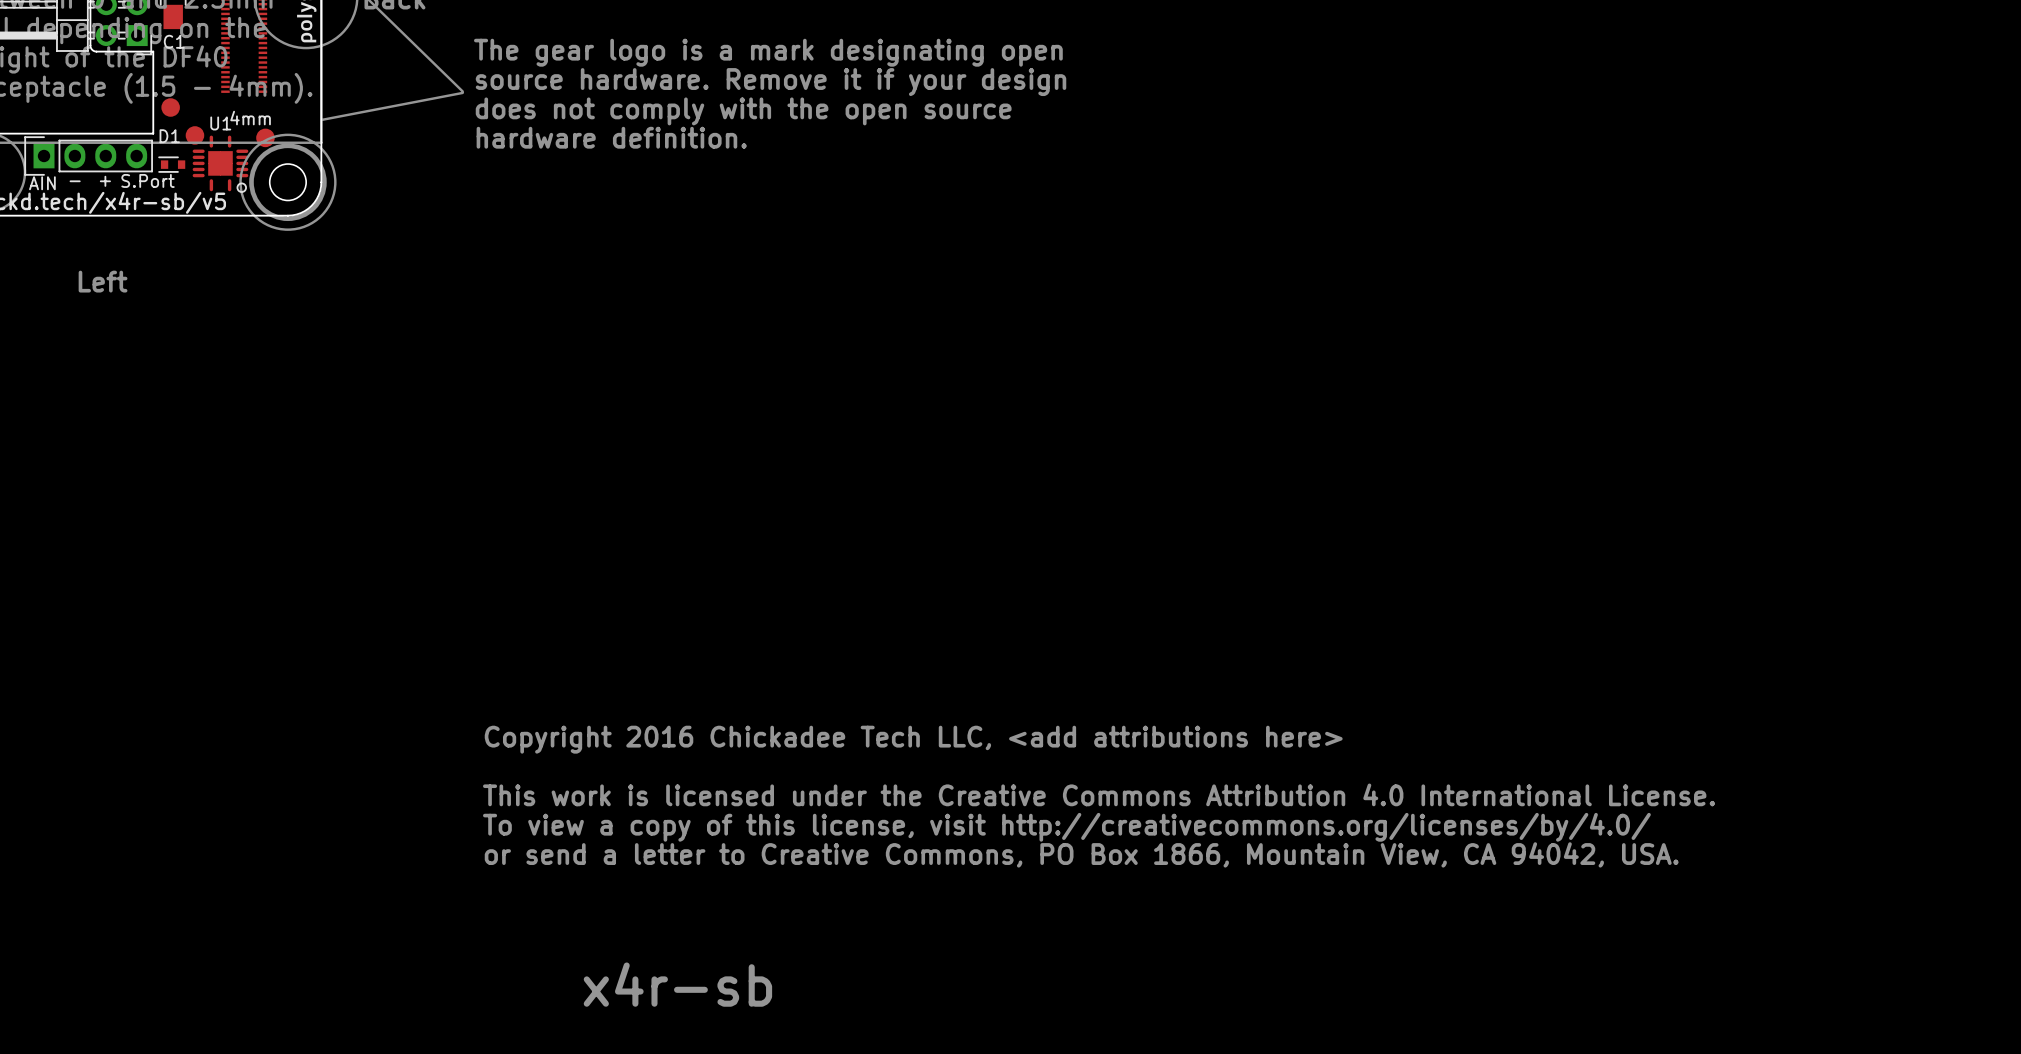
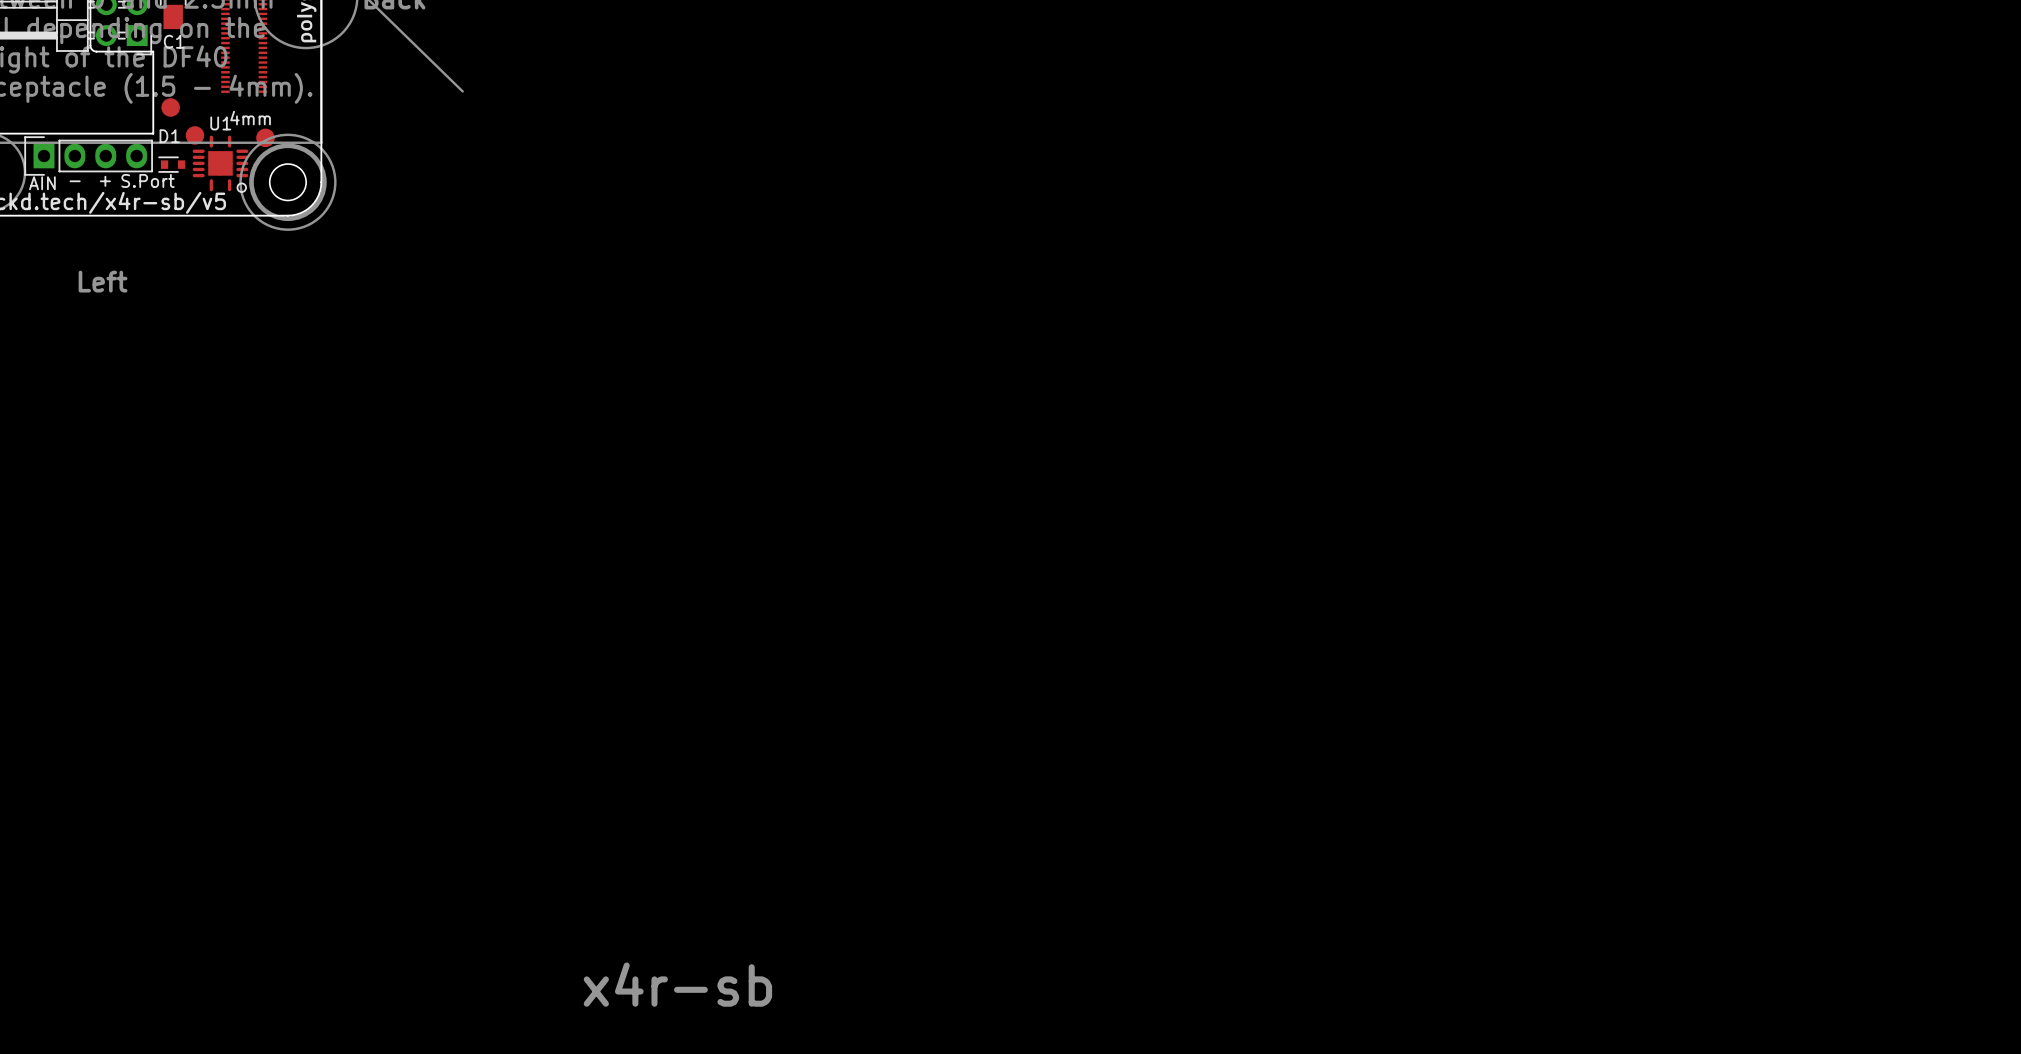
text: The gear logo is a mark designating open (768, 52) -> none
text: source hardware. Remove it if your design (771, 82) -> none
line: (462, 92) (323, 119) -> none
text: does not comply with the open source (743, 111) -> none
text: hardware definition. (611, 137) -> none
text: Copyright 2016 Chickadee Tech LLC, <add attributions here> (913, 739) -> none
text: This work is licensed under the Creative Commons Attribution 4.0 International License. (1099, 794) -> none
text: To view a copy of this license, visit http://creativecommons.org/licenses/by/4.0/ (1066, 827) -> none
text: or send a letter to Creative Commons, PO Box 1866, Mountain View, CA 94042, USA. (1081, 854) -> none

